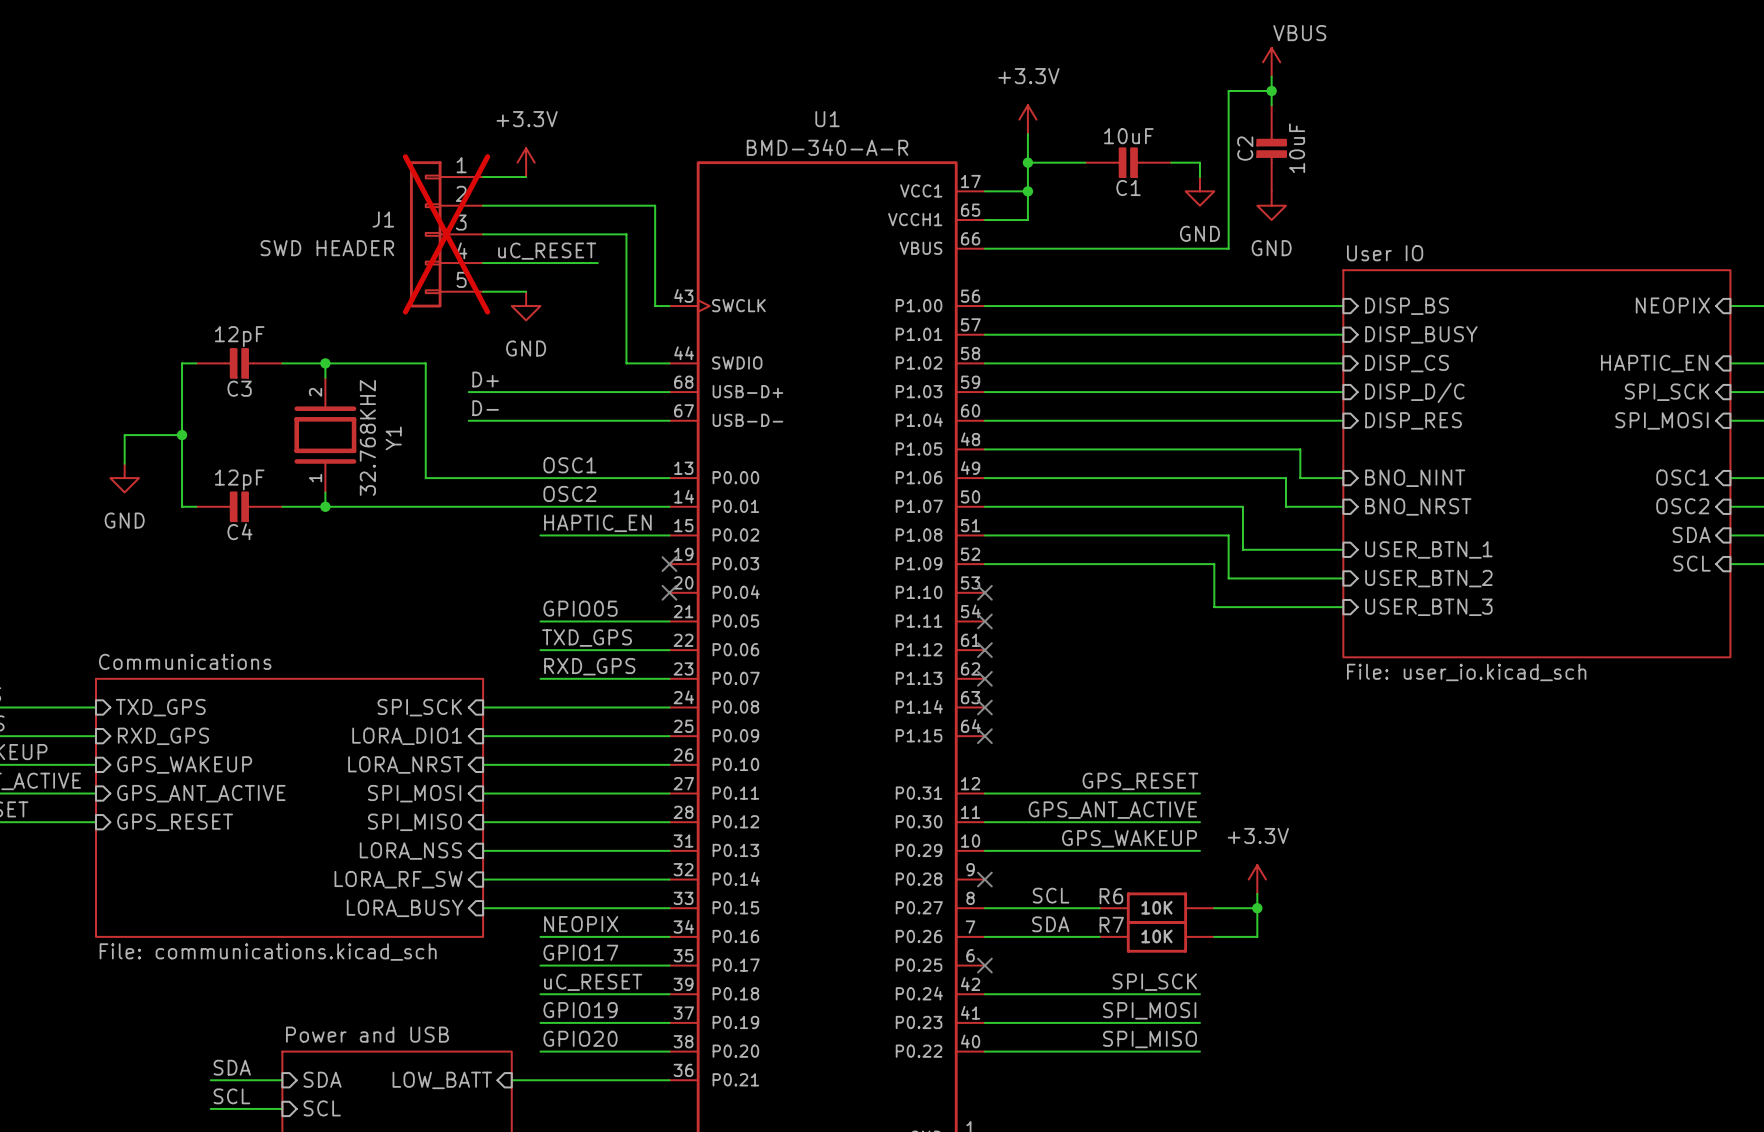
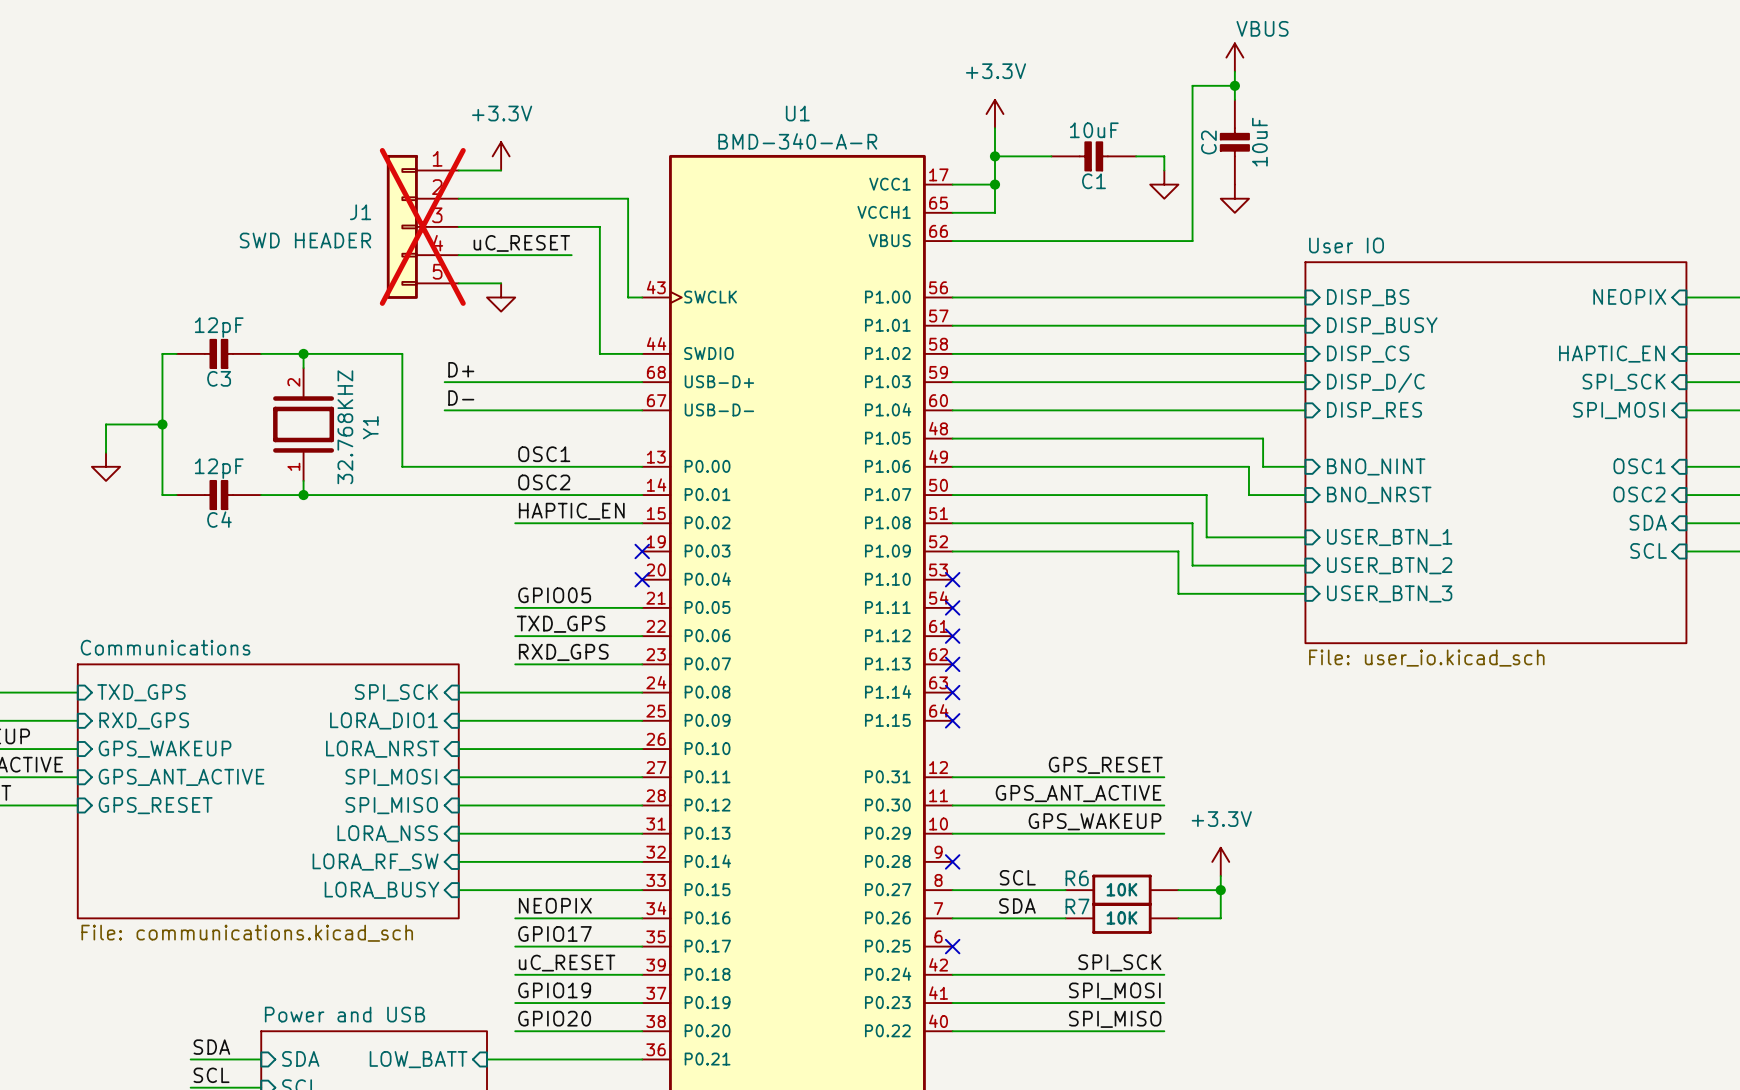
power symbol text: GND (1199, 233) -> none
power symbol text: GND (1271, 248) -> none
power symbol text: GND (526, 348) -> none
power symbol text: GND (124, 520) -> none

